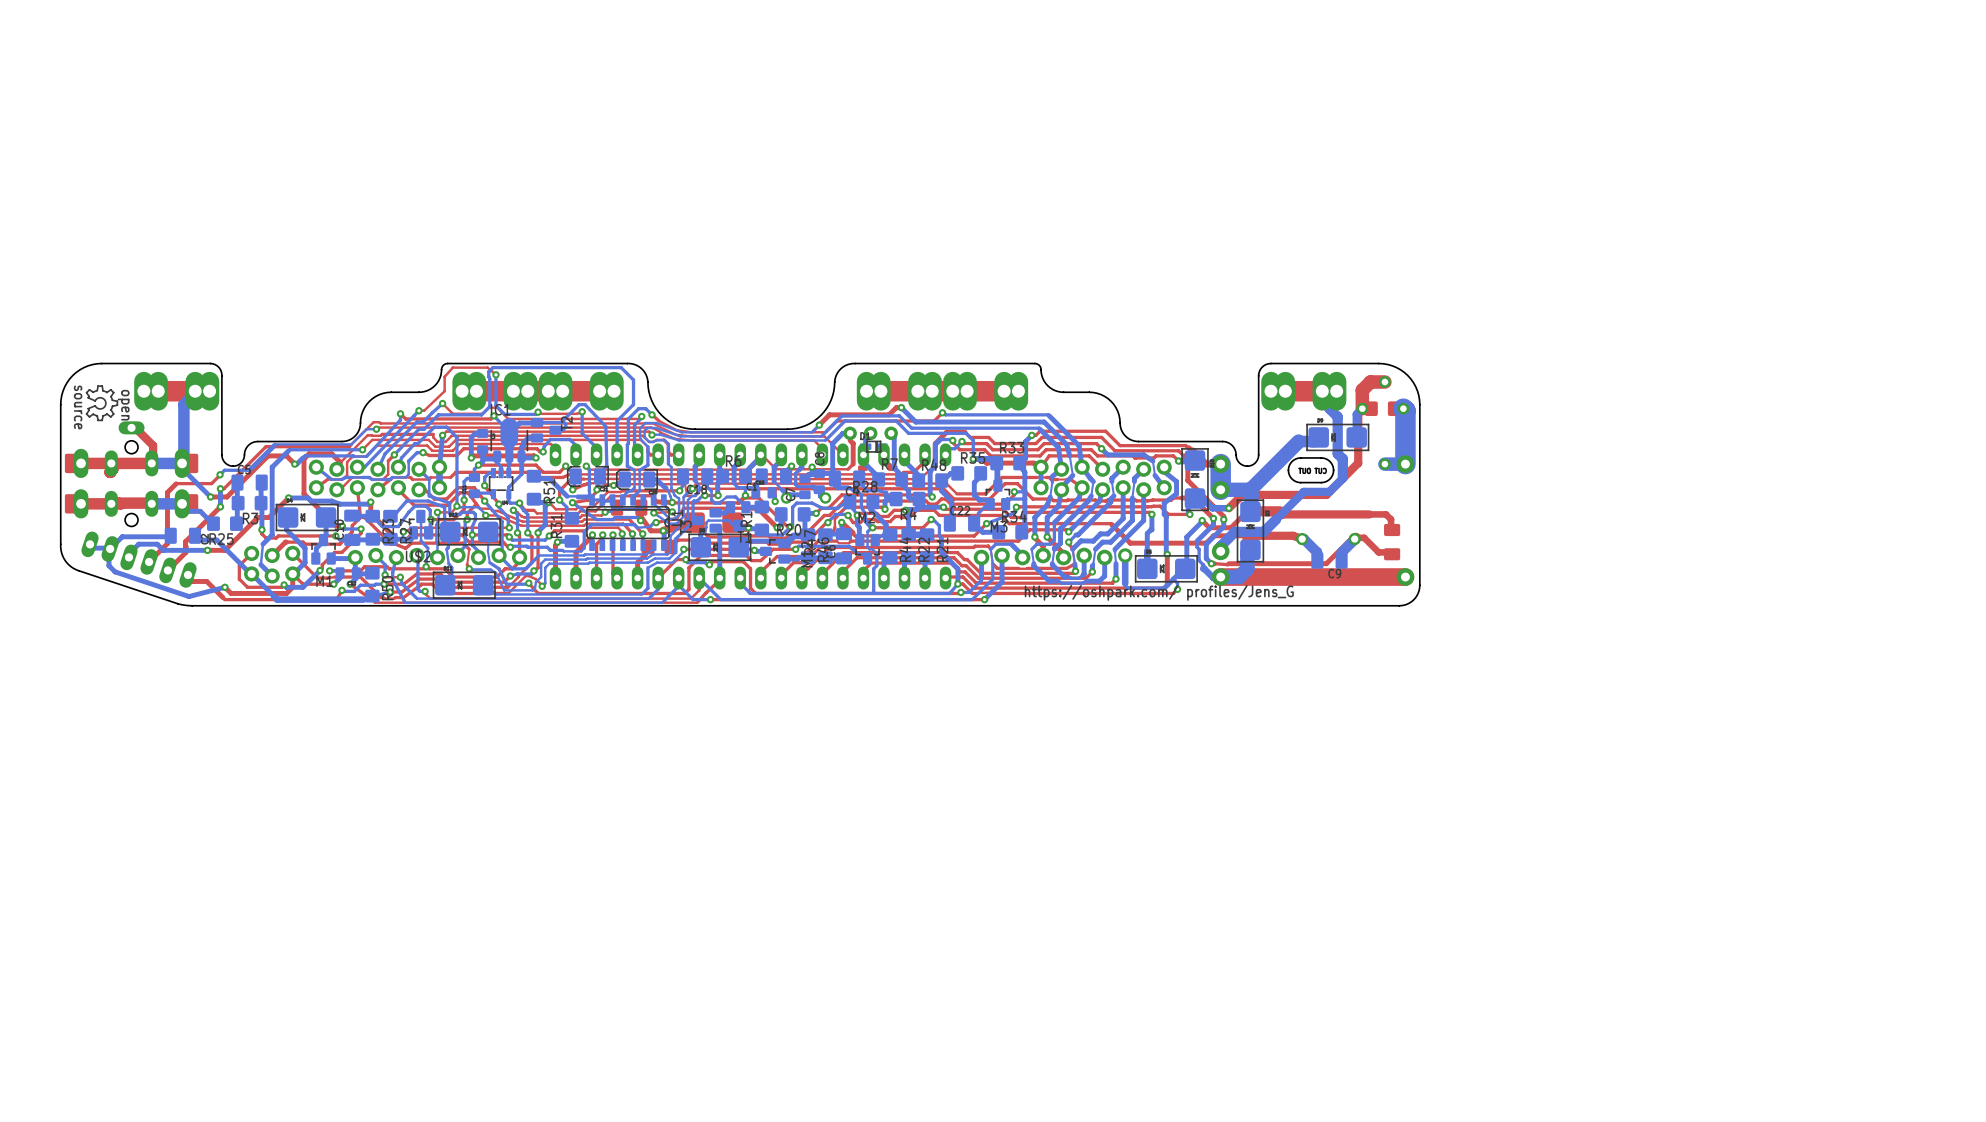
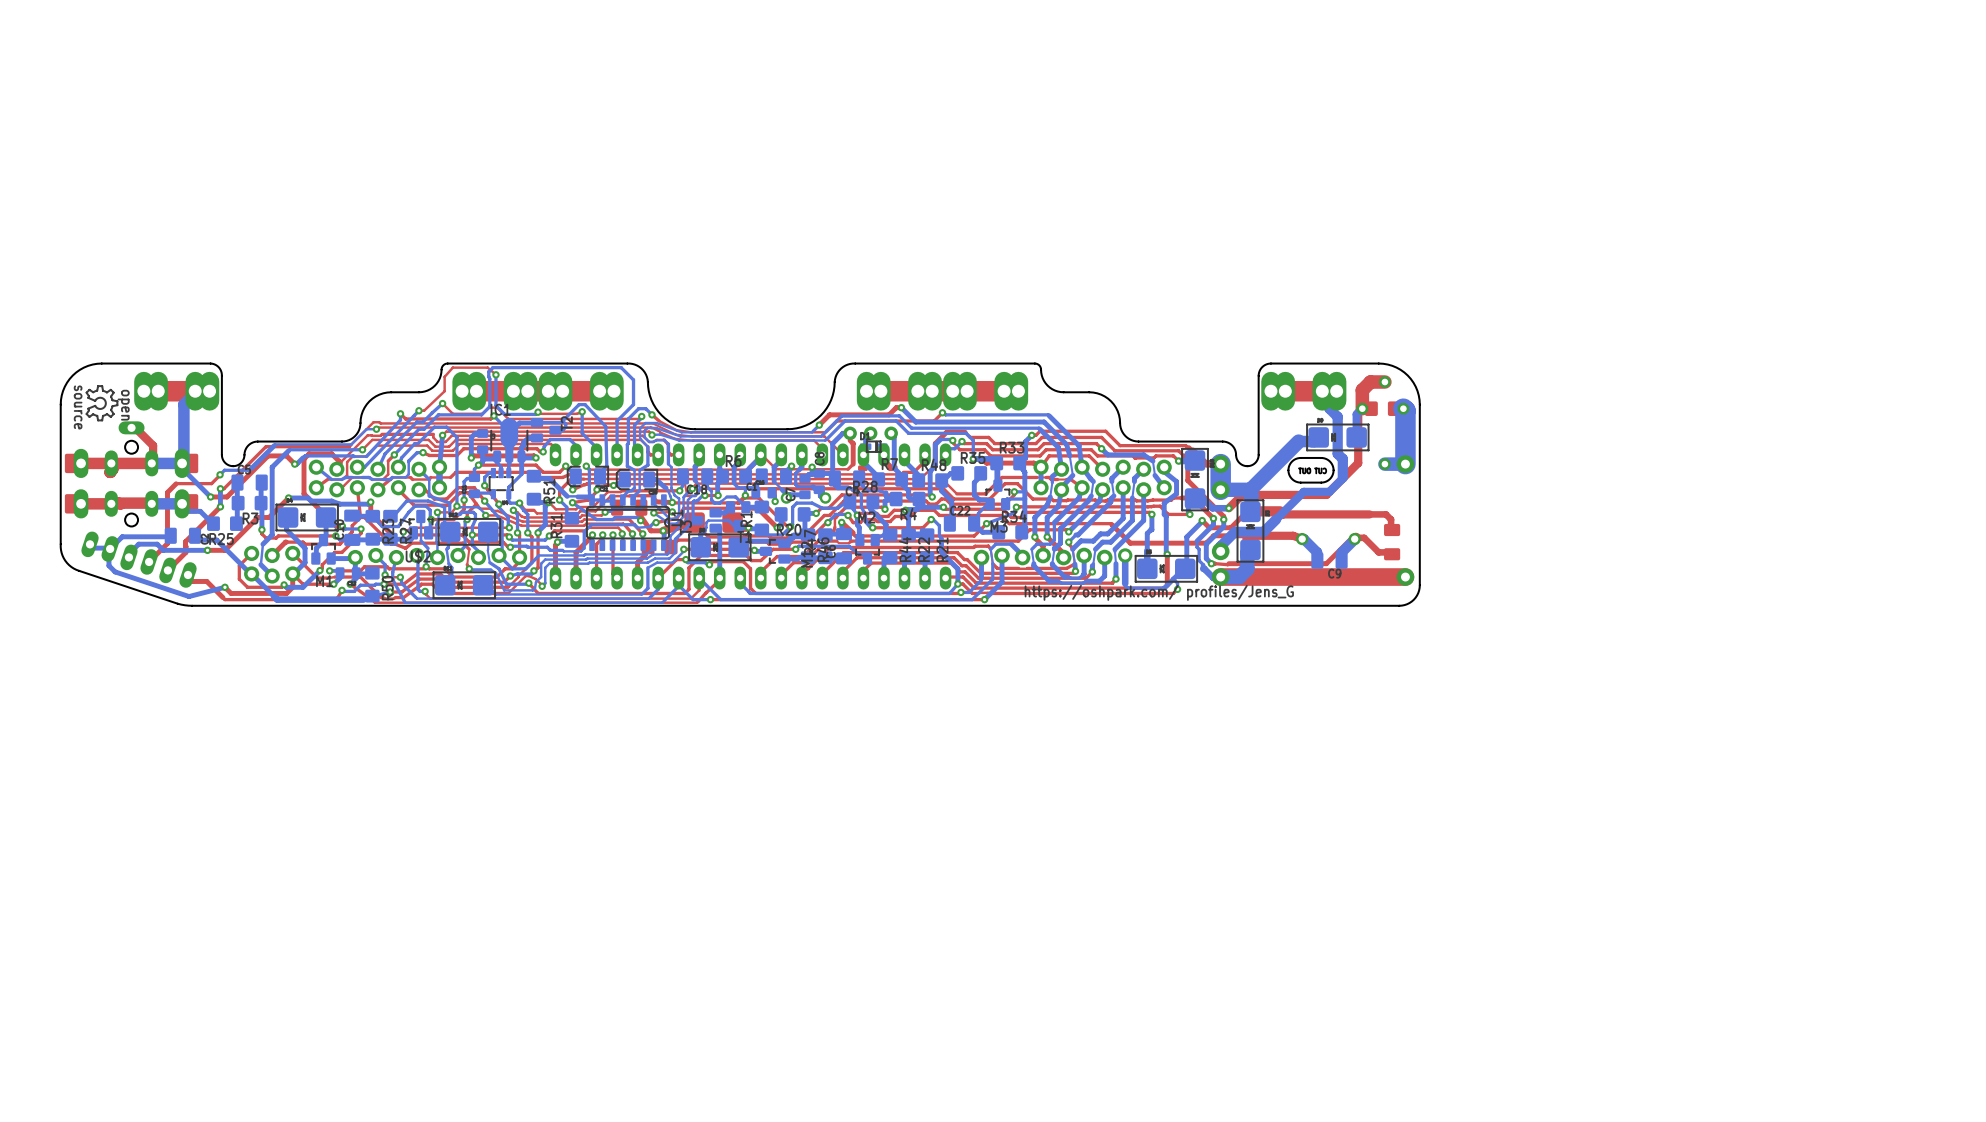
bottom track: (871, 527) (867, 531) (867, 547) (876, 553) (876, 565) (873, 568) (873, 593) -> none

